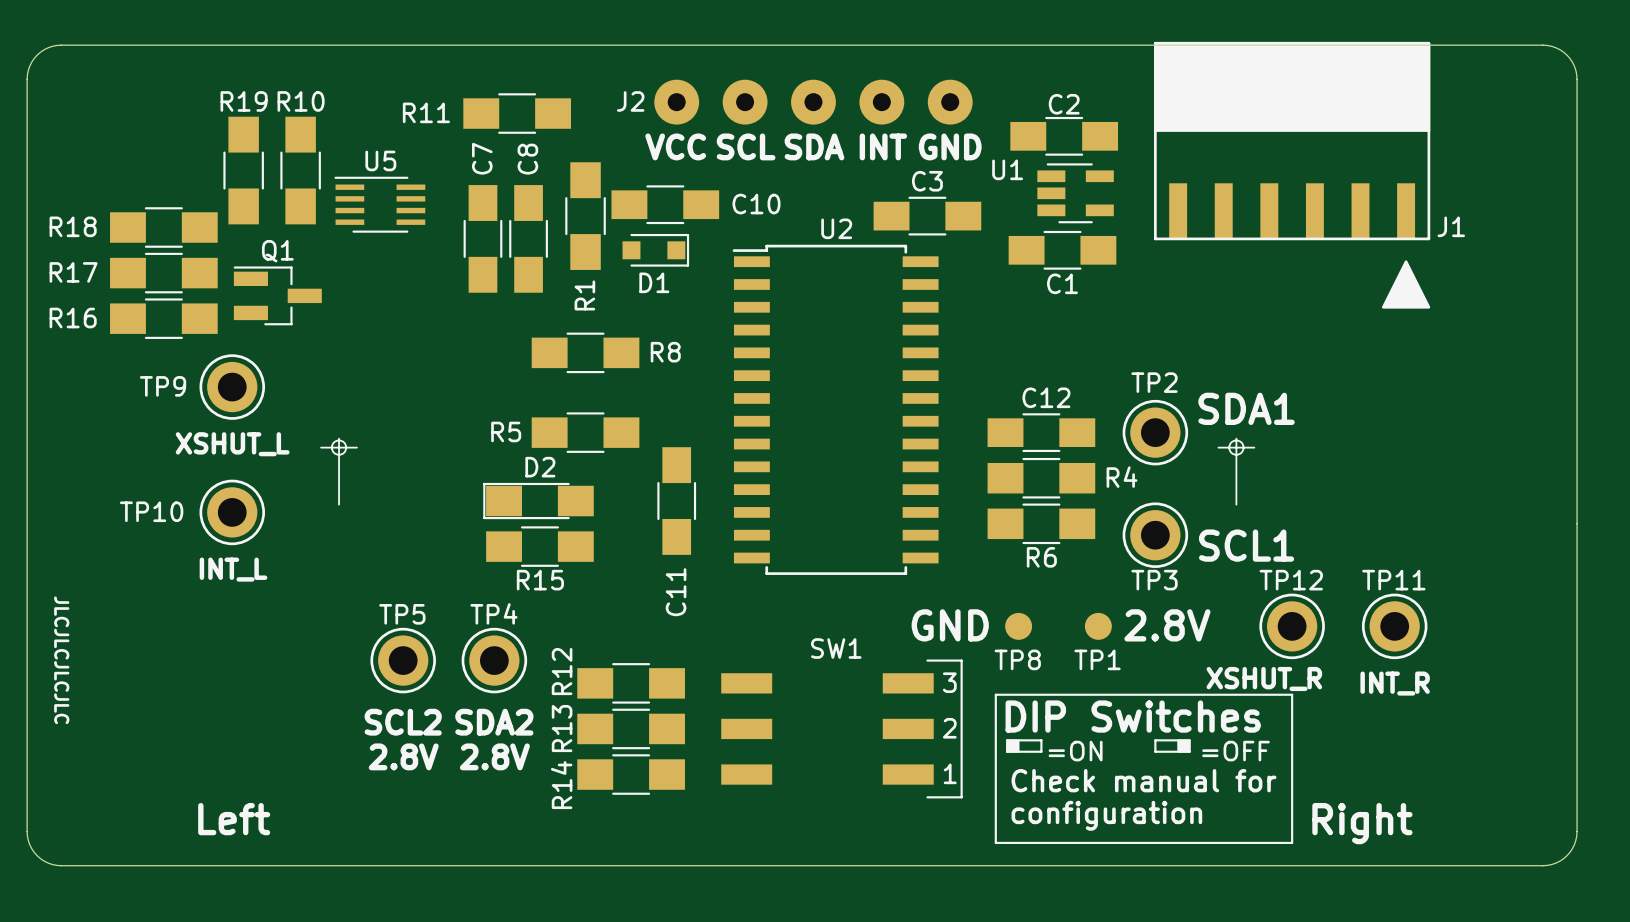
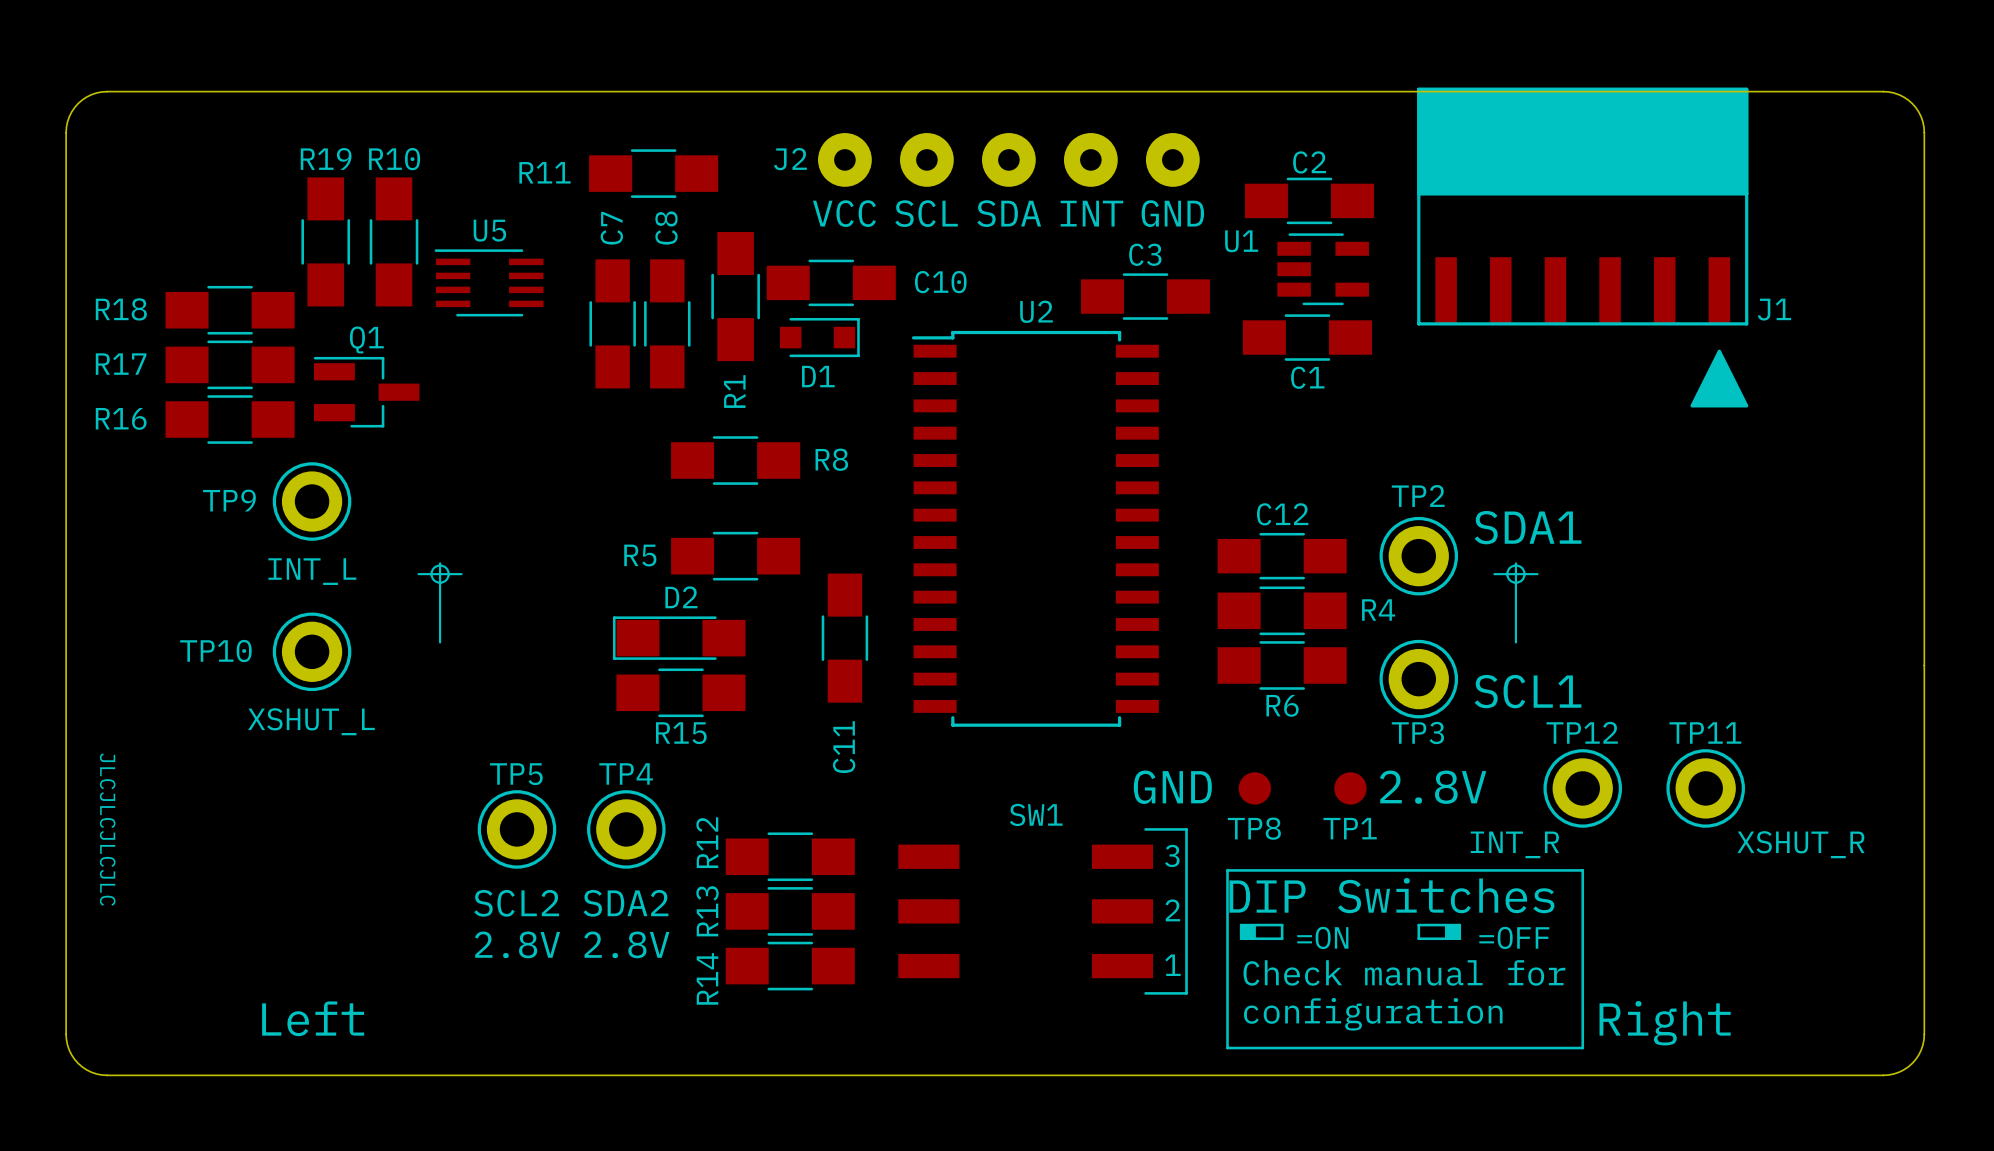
text: XSHUT_L (232, 444) -> INT_L (312, 571)
text: INT_L (233, 569) -> XSHUT_L (311, 721)
text position: XSHUT_R (1264, 678) -> XSHUT_R (1800, 844)
text position: INT_R (1395, 683) -> INT_R (1514, 844)

